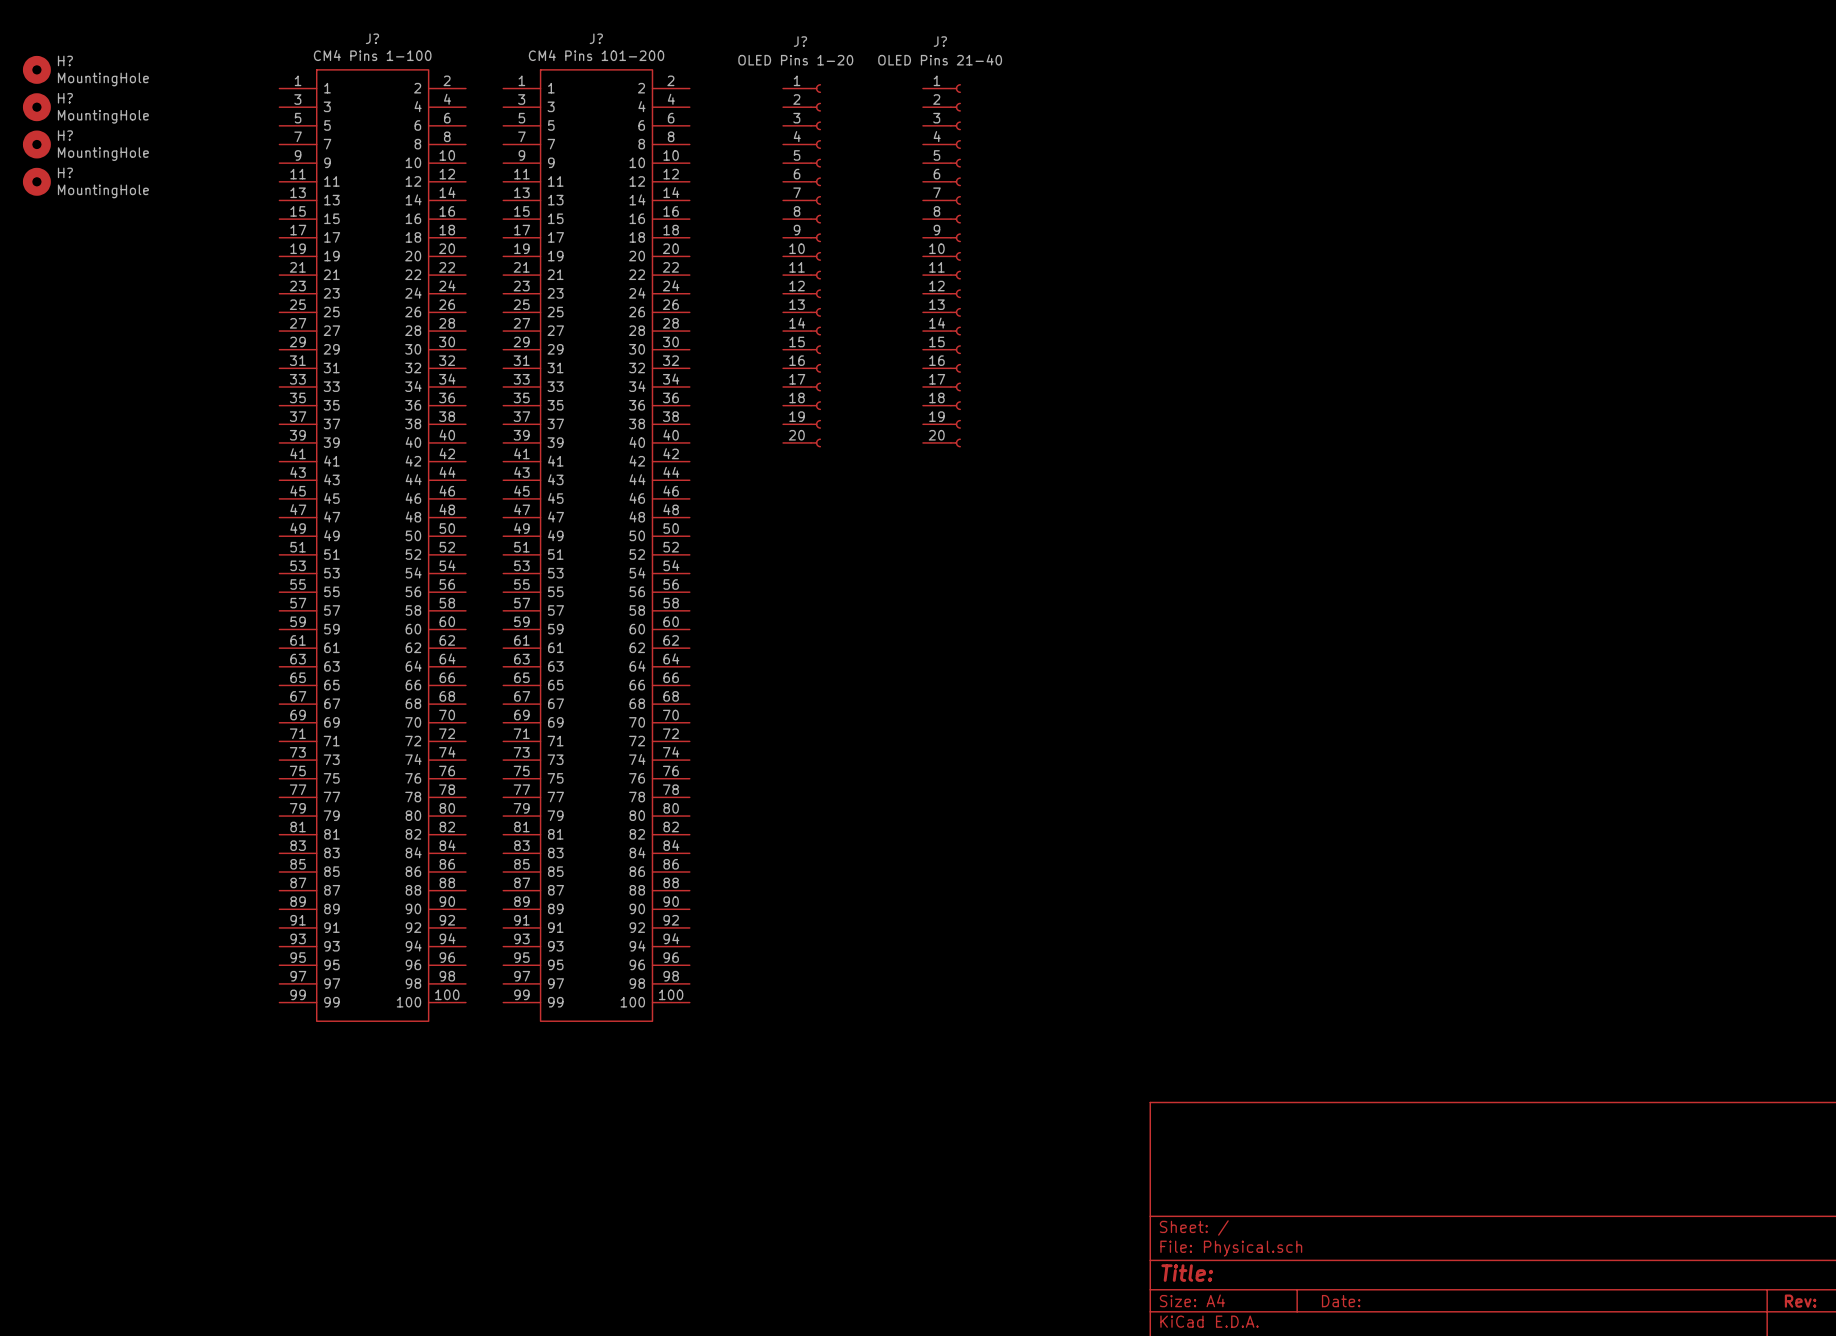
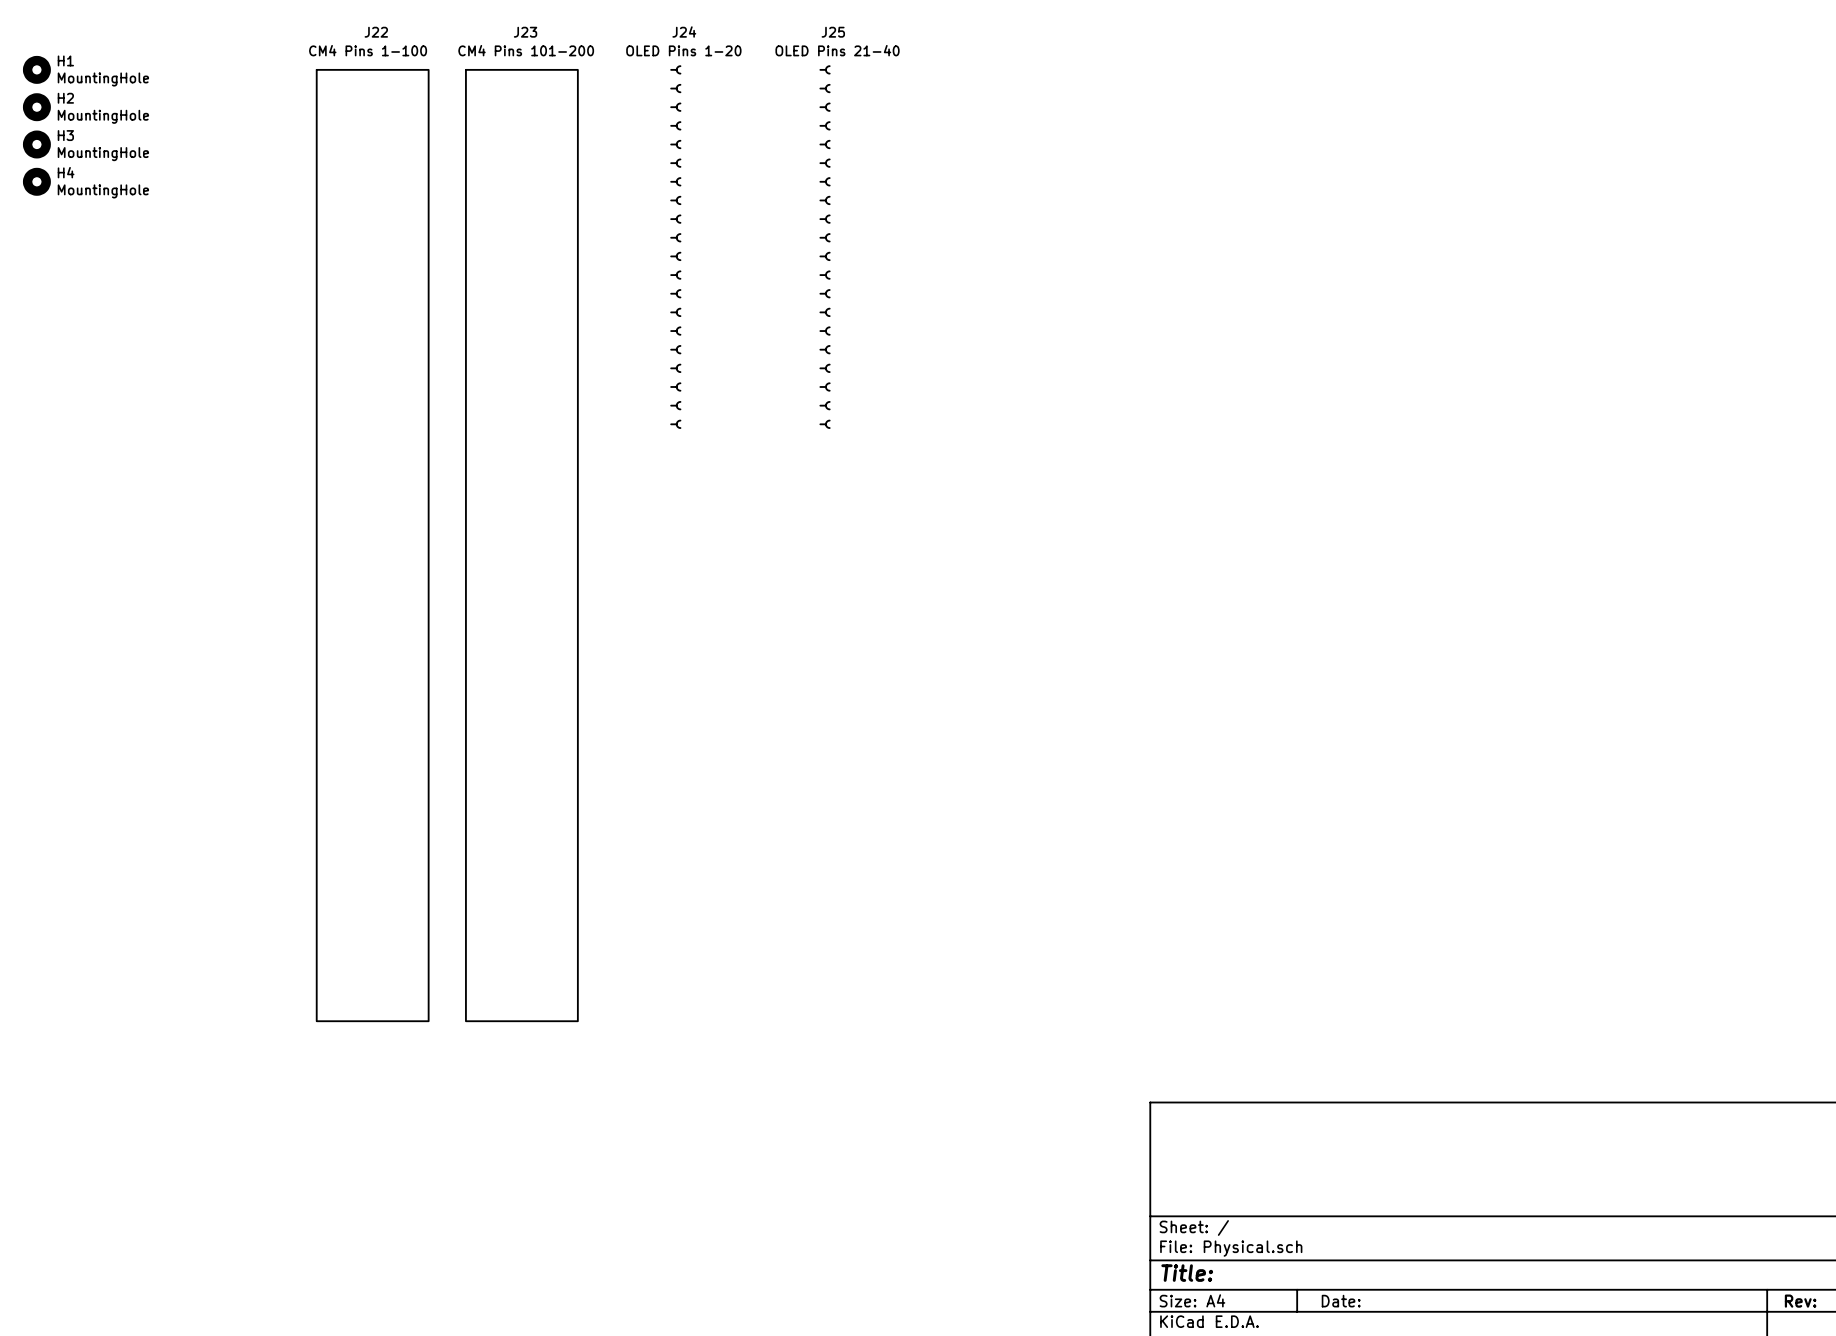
H? name: H? (65, 60) -> H1 (65, 60)
H? name: H? (65, 98) -> H2 (65, 98)
H? name: H? (65, 135) -> H3 (65, 135)
H? name: H? (65, 172) -> H4 (66, 172)
J24: none -> OLED Pins 1-20 (675, 247)
J25: none -> OLED Pins 21-40 (825, 247)
J?: OLED Pins 1-20 (801, 265) -> none
J?: OLED Pins 21-40 (941, 265) -> none
J?: CM4 Pins 1-100 (372, 545) -> none
J22: none -> CM4 Pins 1-100 (372, 545)
J23: none -> CM4 Pins 101-200 (521, 545)
J?: CM4 Pins 101-200 (596, 545) -> none

